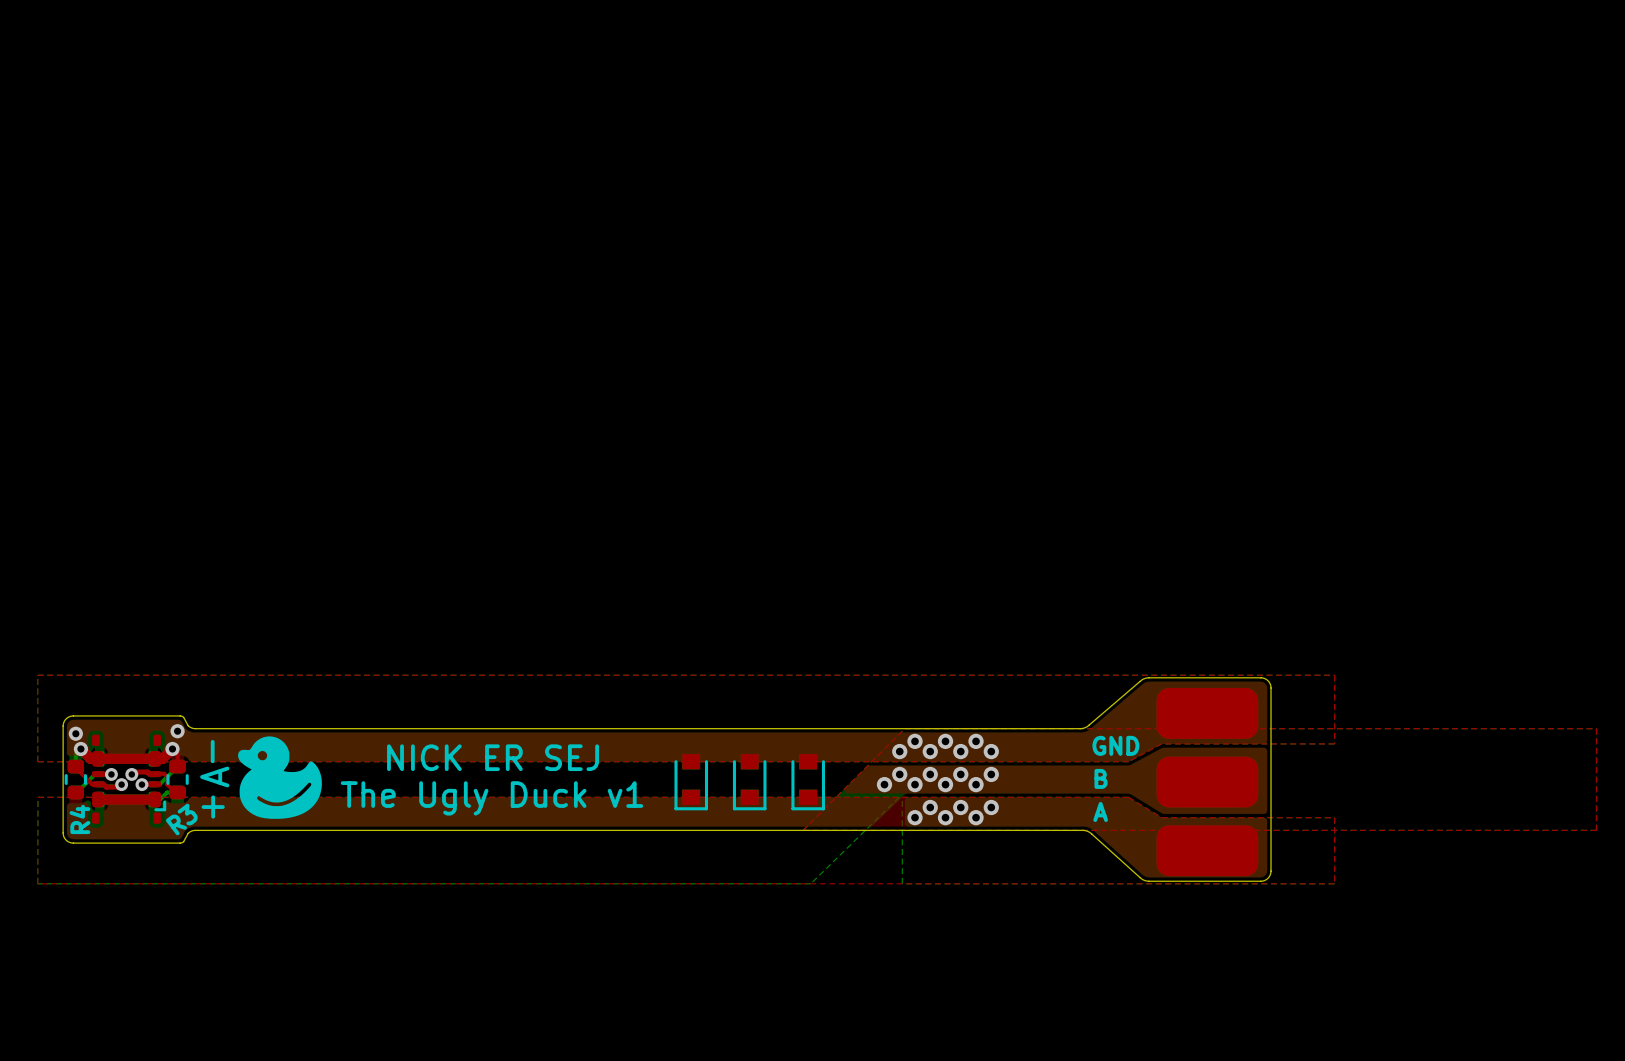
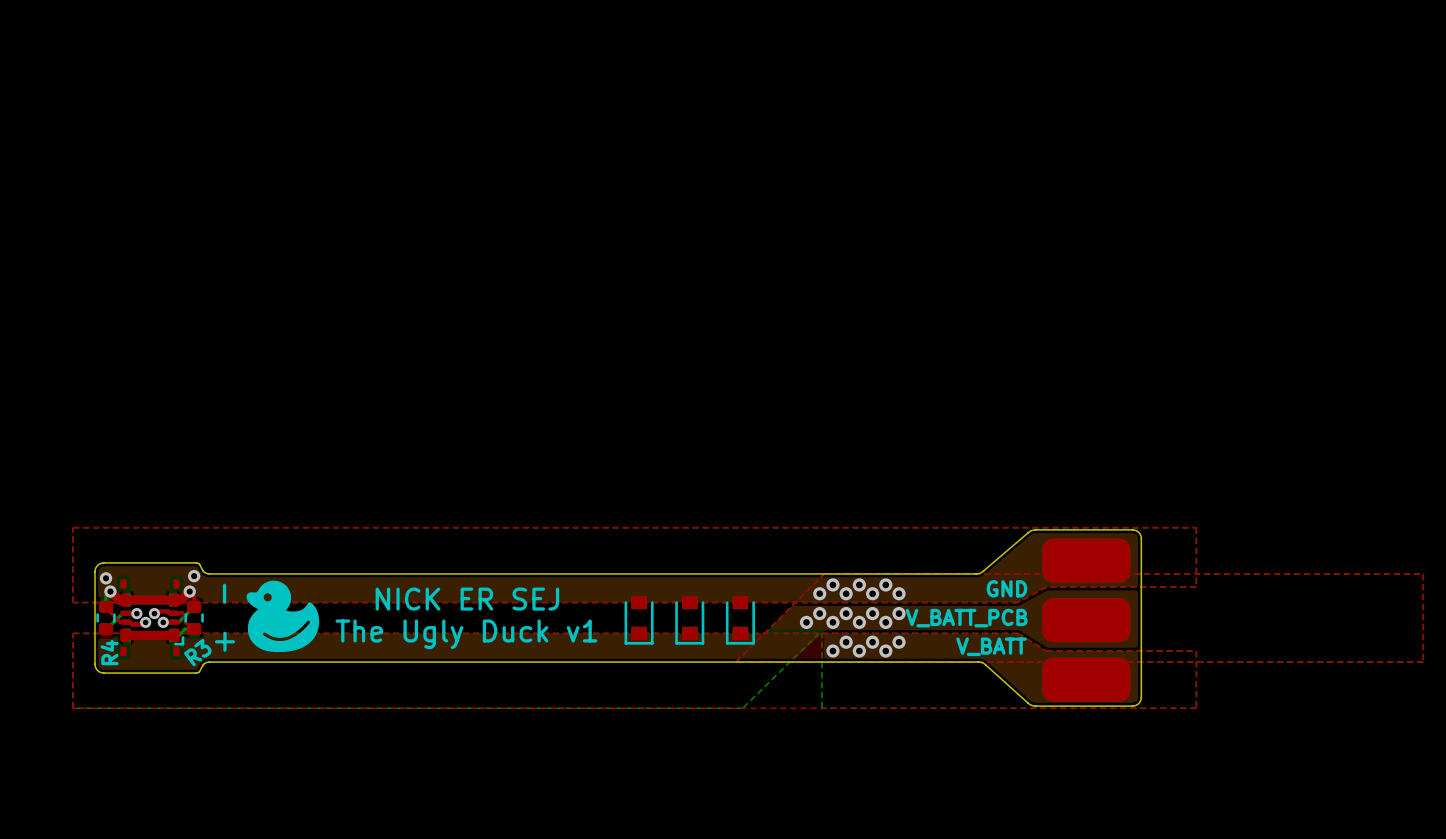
text: A (214, 776) -> none
part value: B (1101, 778) -> V_BATT_PCB (966, 618)
part value: A (1100, 811) -> V_BATT (991, 646)

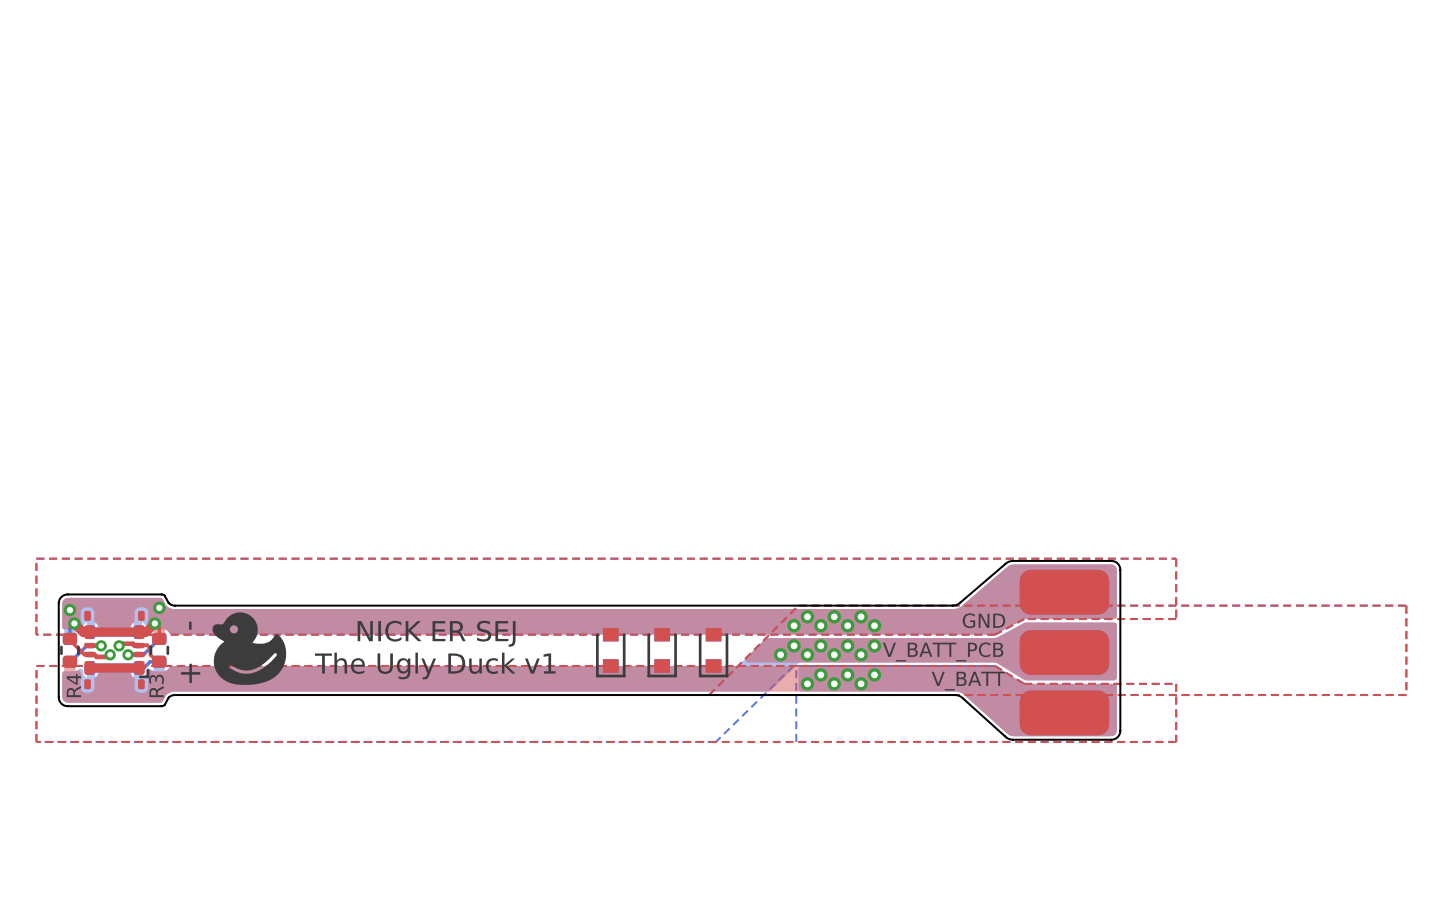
R3 name rotation: 0° (197, 652) -> 53° counterclockwise (156, 685)

